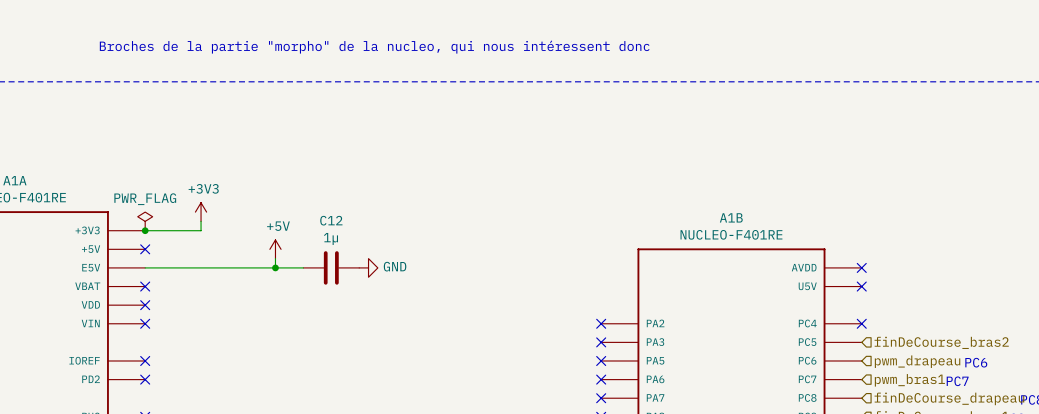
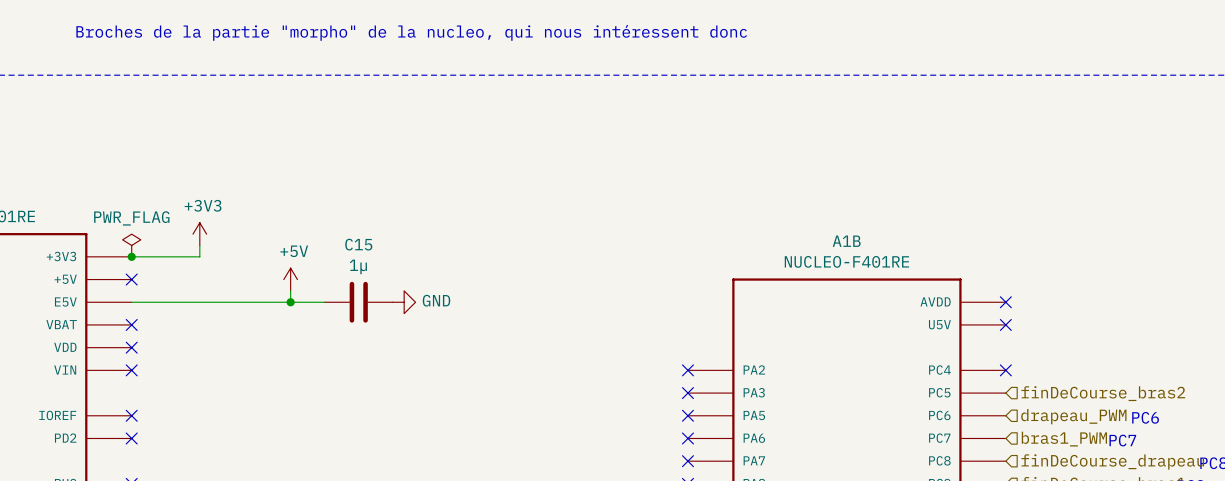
C12 name: C12 (331, 220) -> C15 (358, 244)
hierarchical label: pwm_drapeau (917, 361) -> drapeau_PWM (1073, 416)
hierarchical label: pwm_bras1 (909, 380) -> bras1_PWM (1064, 439)

